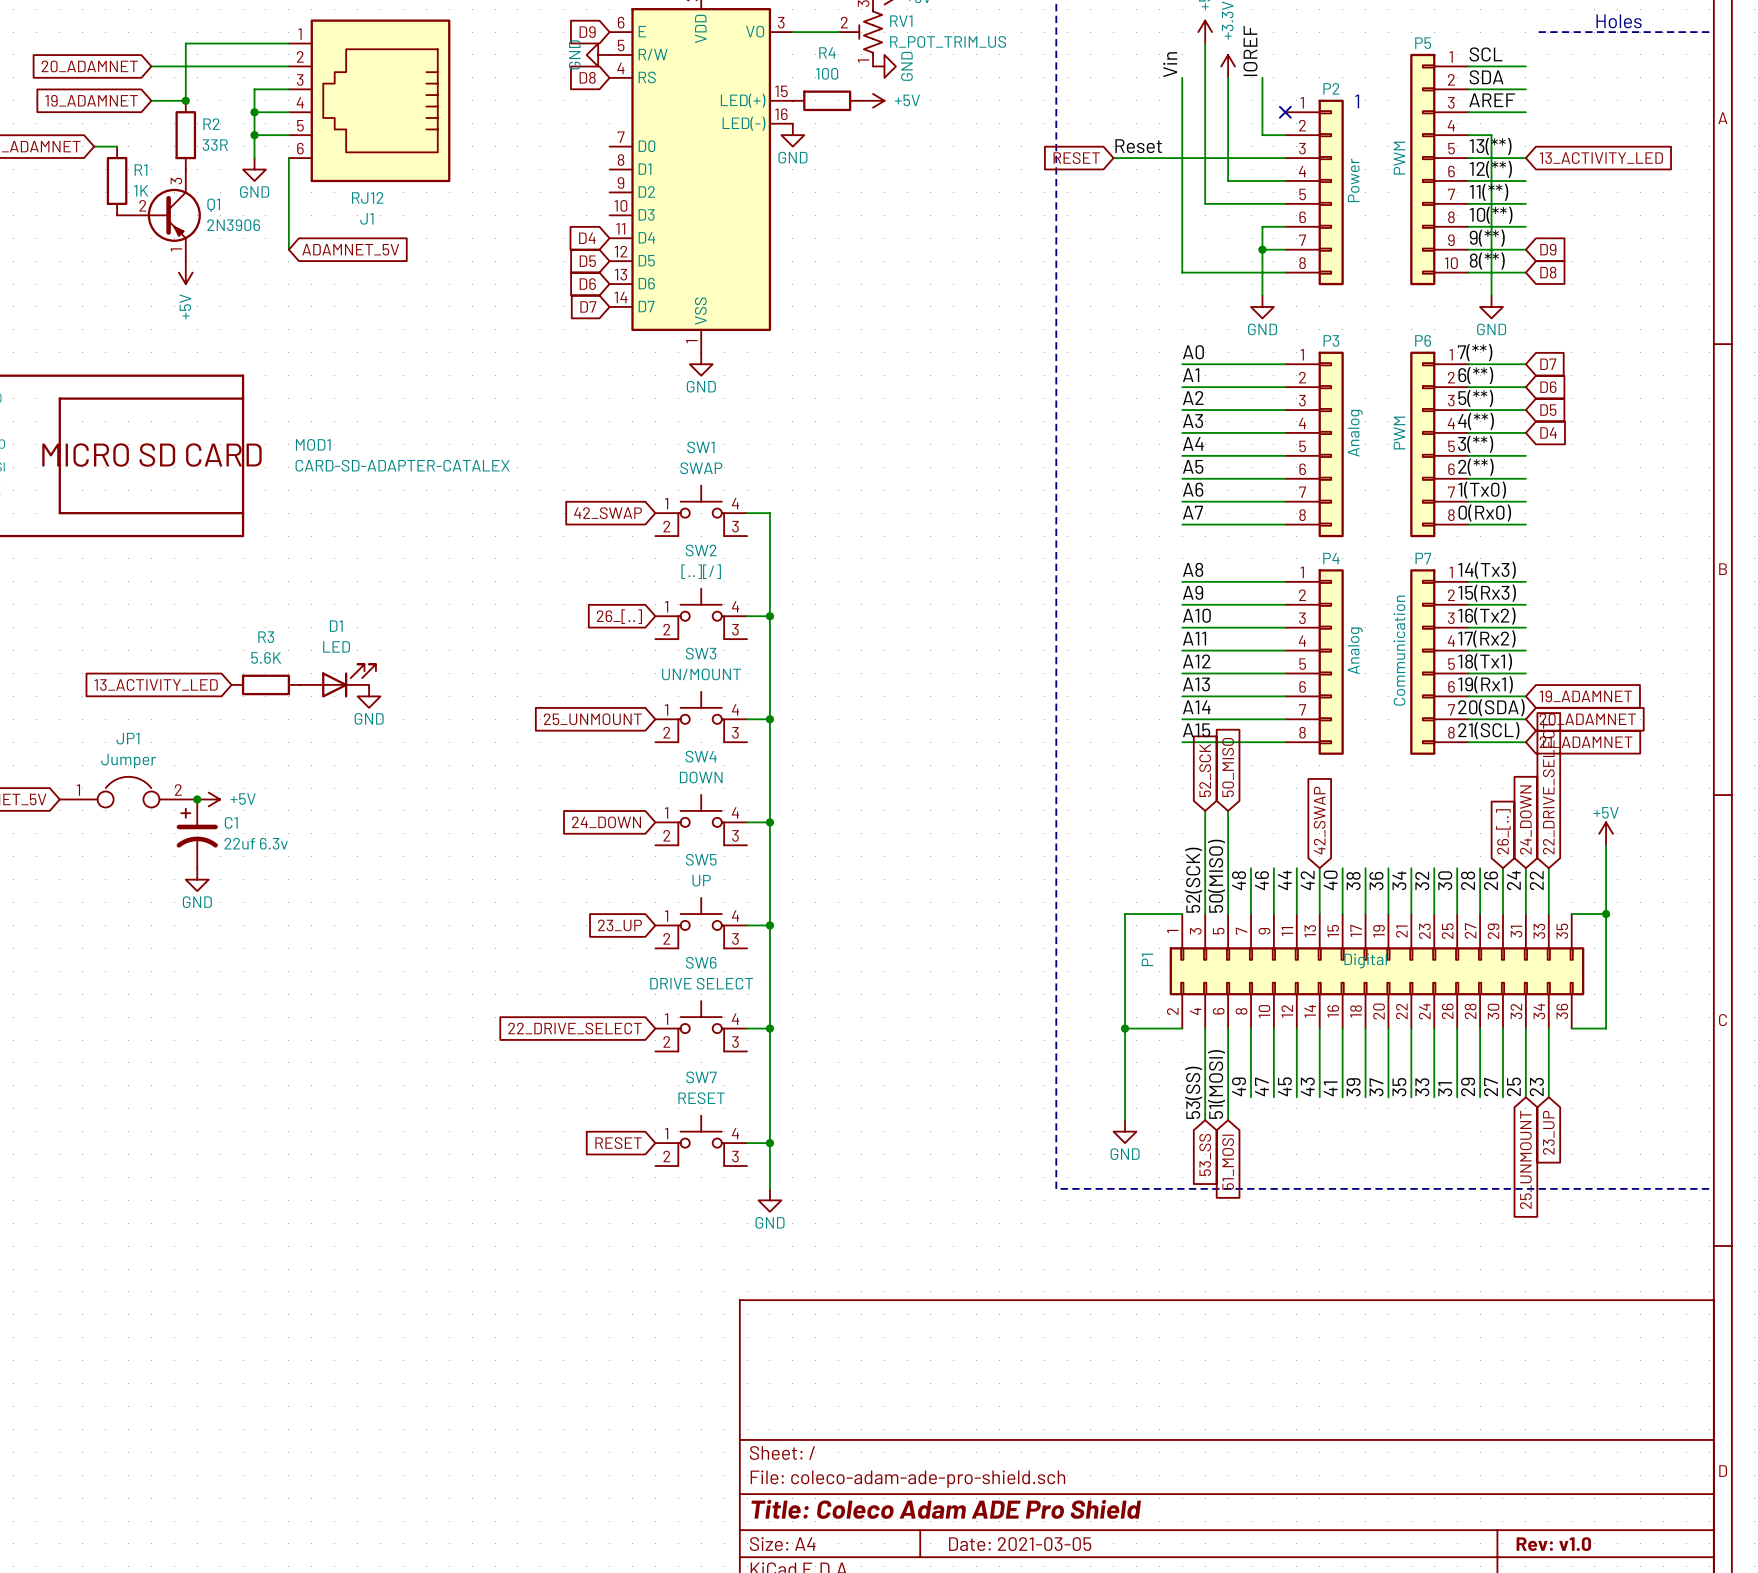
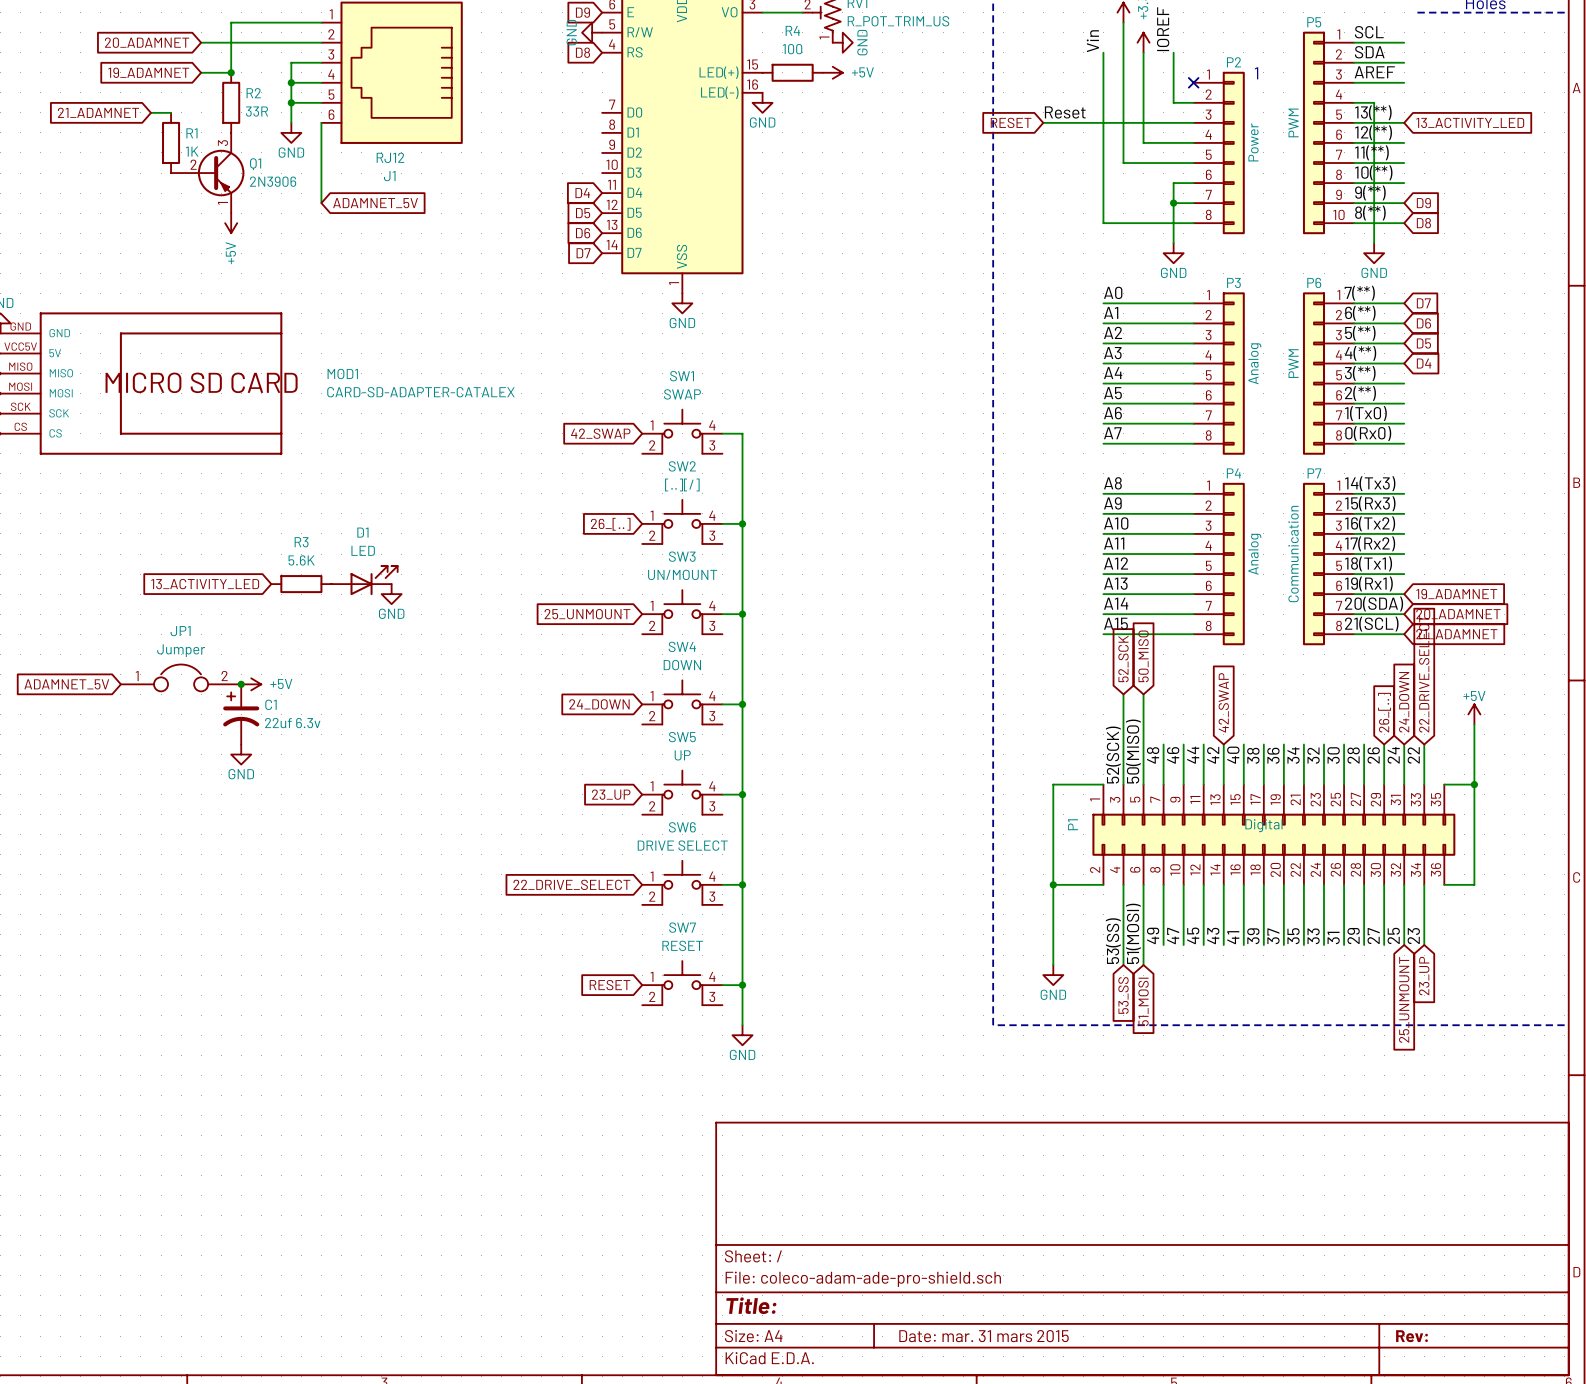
title block: Title: Coleco Adam ADE Pro Shield (946, 1509) -> Title: (751, 1305)
title block: Date: 2021-03-05 (1020, 1544) -> Date: mar. 31 mars 2015 (984, 1336)
title block: Rev: v1.0 (1553, 1544) -> Rev: (1411, 1336)

